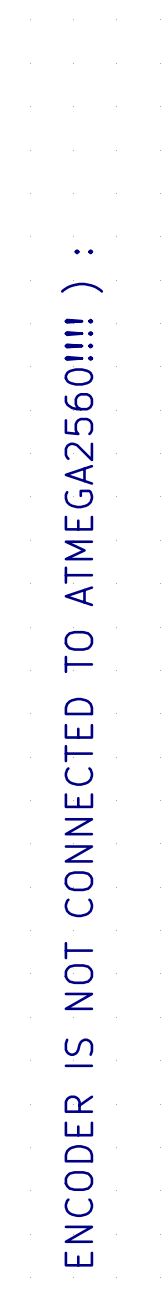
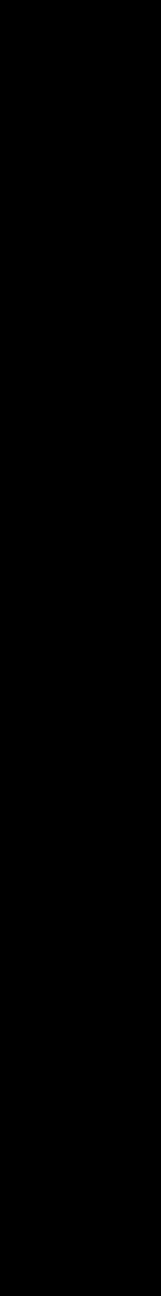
text: ENCODER IS NOT CONNECTED TO ATMEGA2560!!!! ) : (82, 757) -> none

